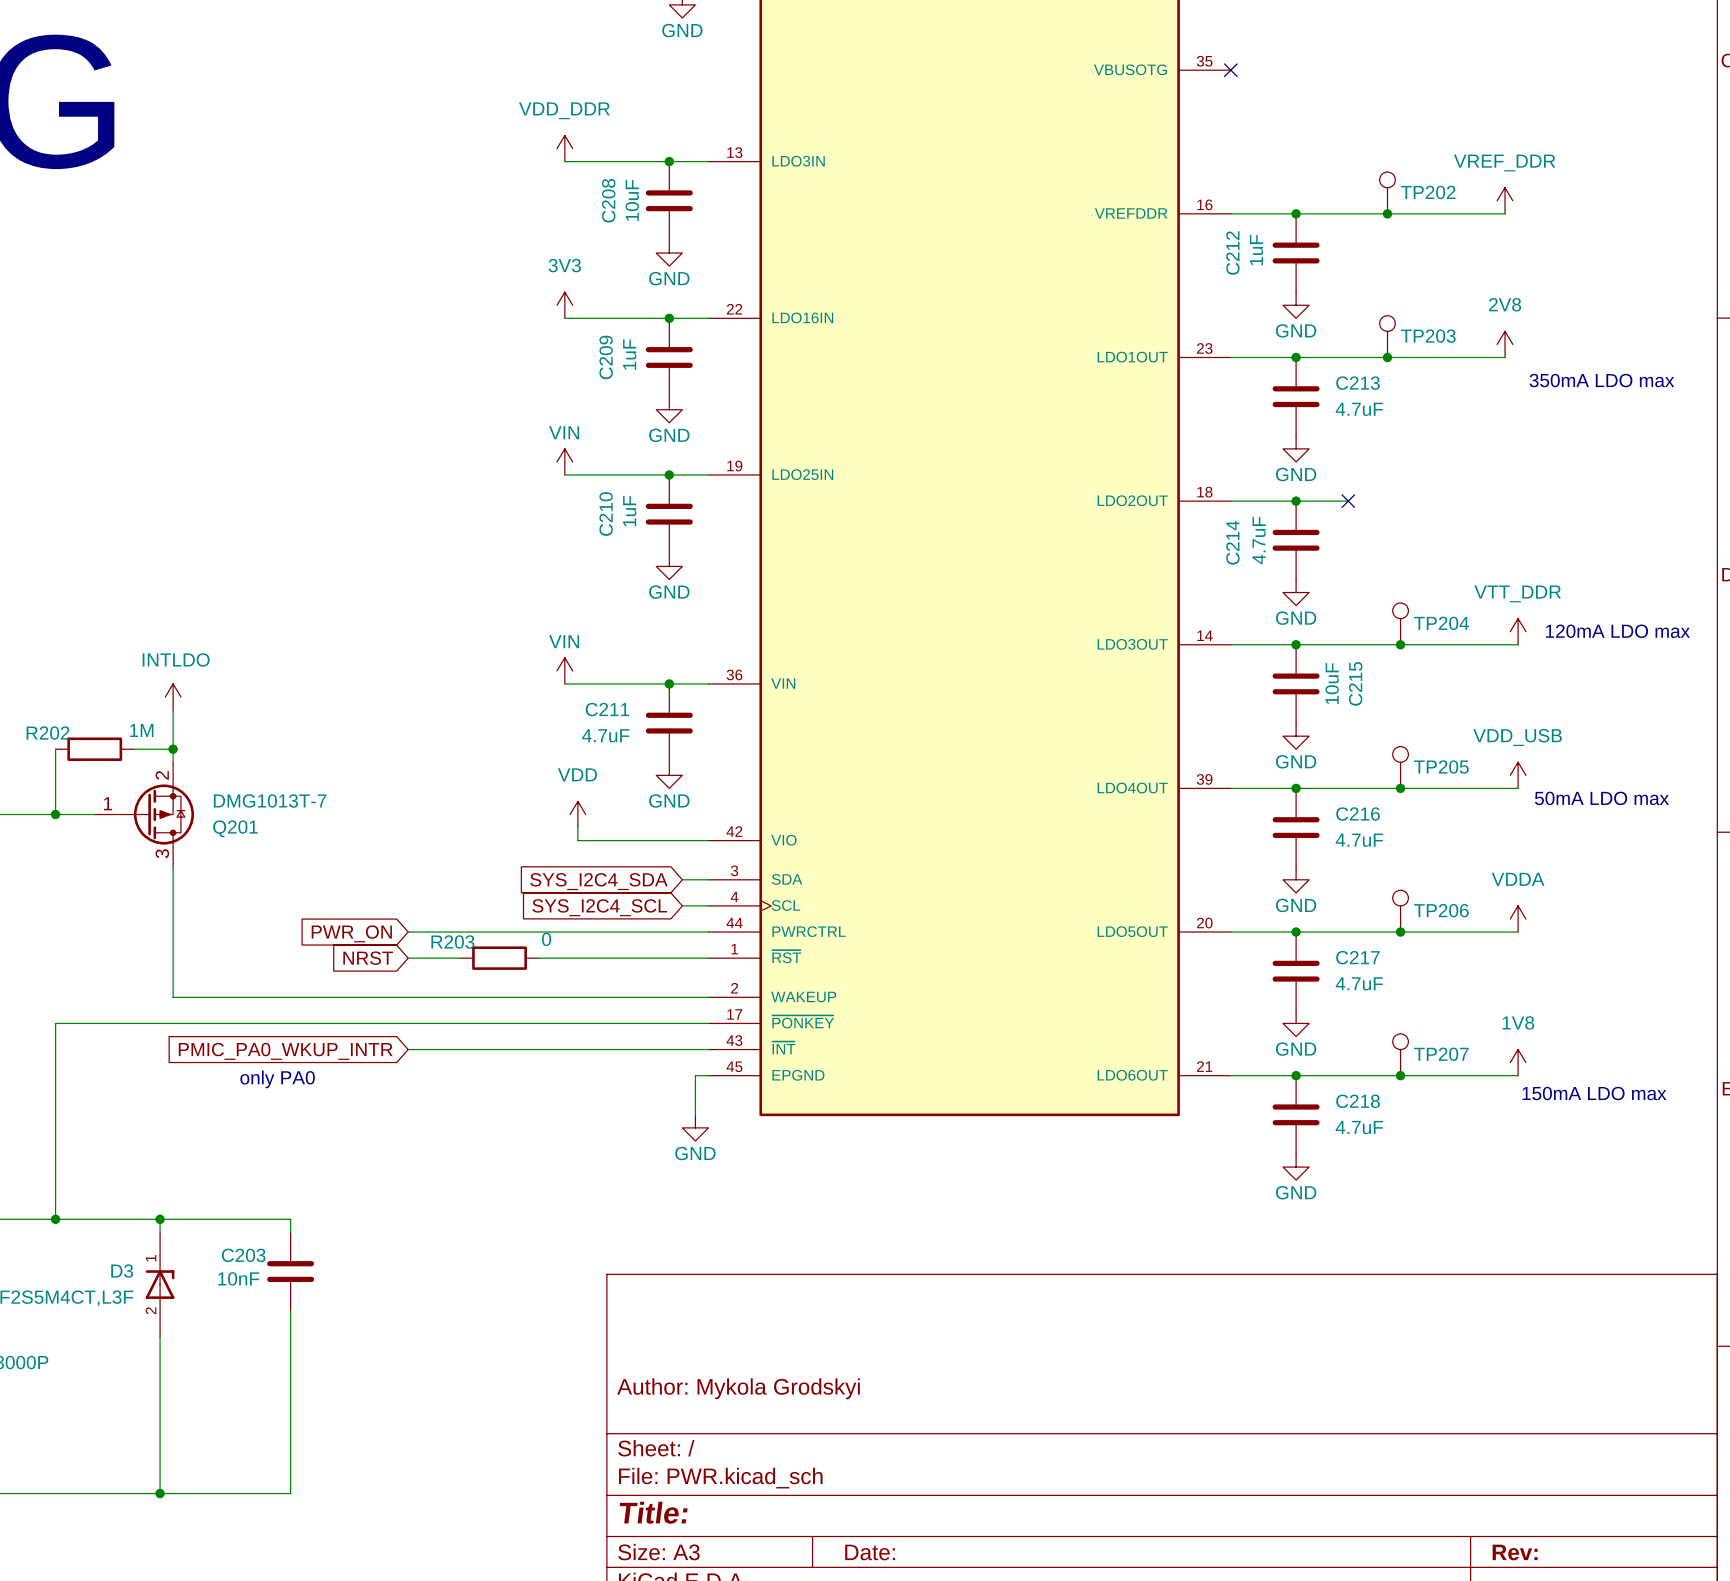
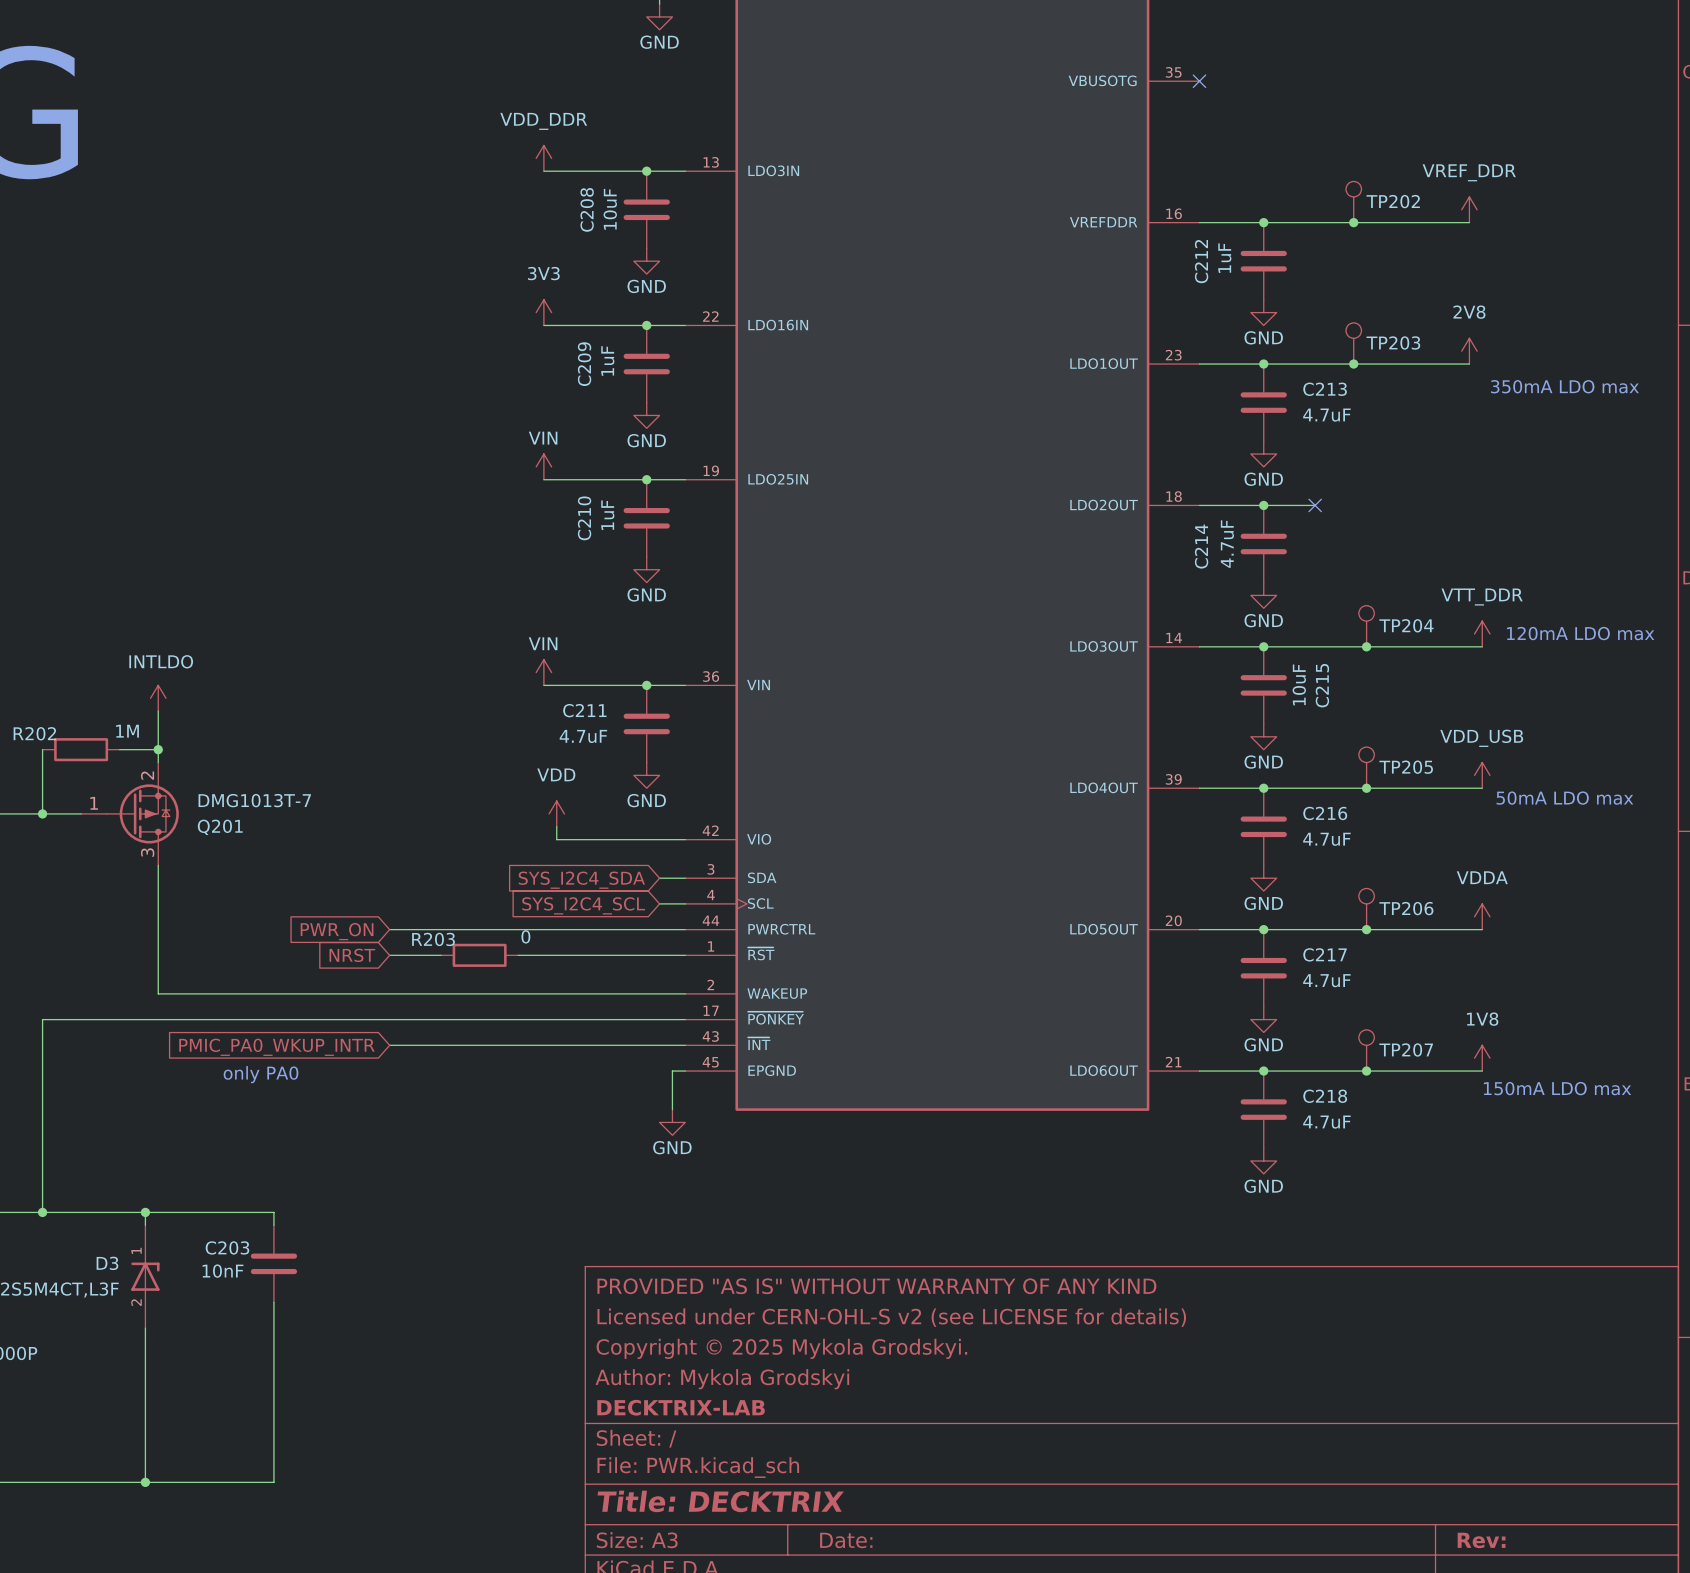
title block: none -> PROVIDED "AS IS" WITHOUT WARRANTY OF ANY KIND (876, 1286)
title block: none -> Licensed under CERN-OHL-S v2 (see LICENSE for details) (891, 1317)
title block: none -> Copyright © 2025 Mykola Grodskyi. (781, 1348)
title block: none -> DECKTRIX-LAB (681, 1407)
title block: Title: (653, 1512) -> Title: DECKTRIX (720, 1501)

